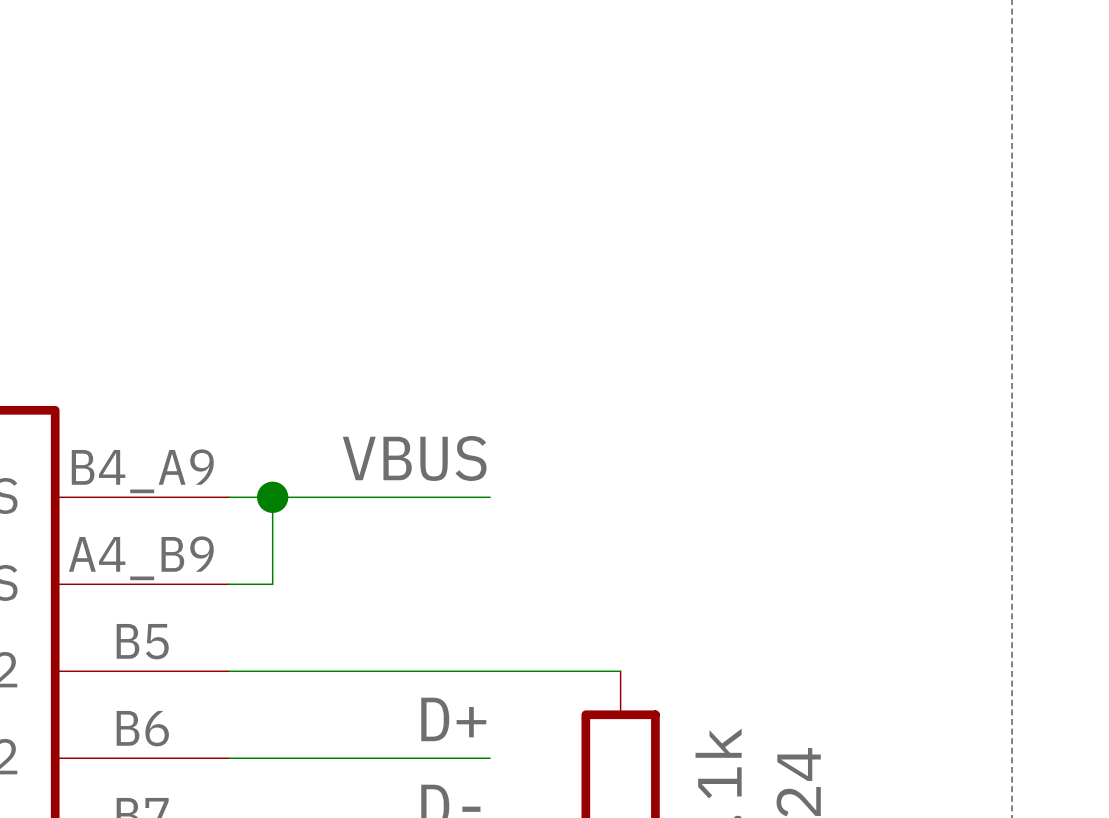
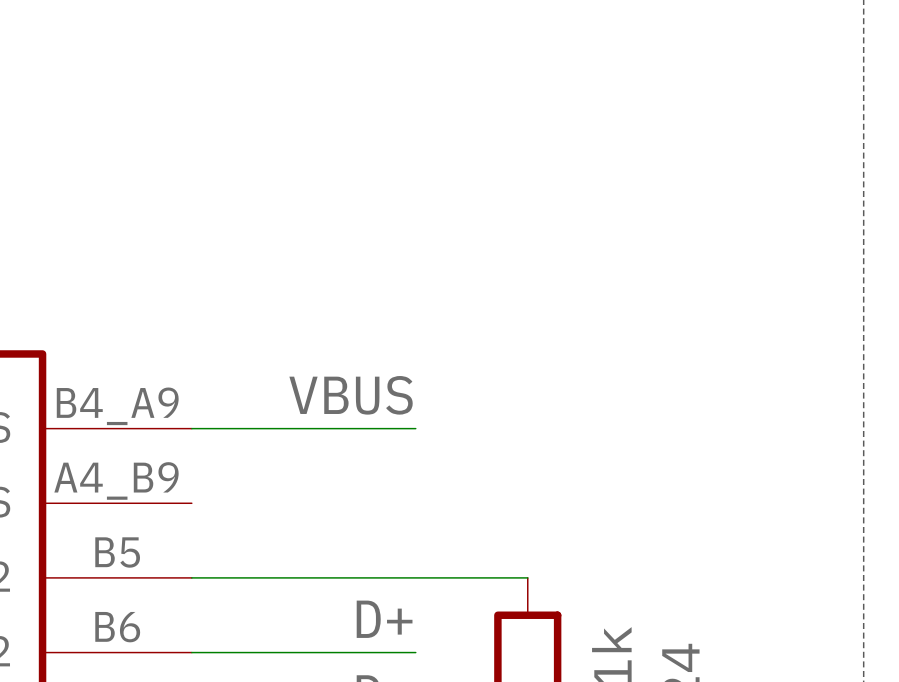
wire: (272, 497) (272, 584) (229, 584) -> none
junction: (272, 497) -> none

